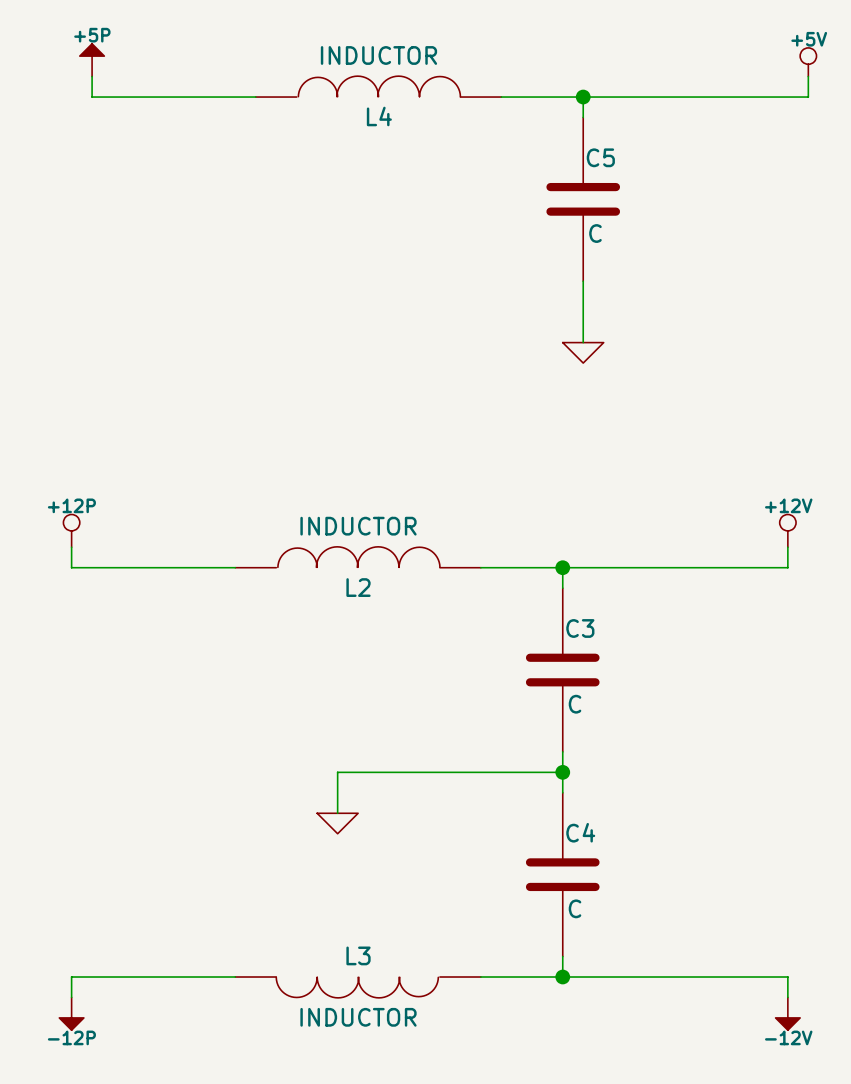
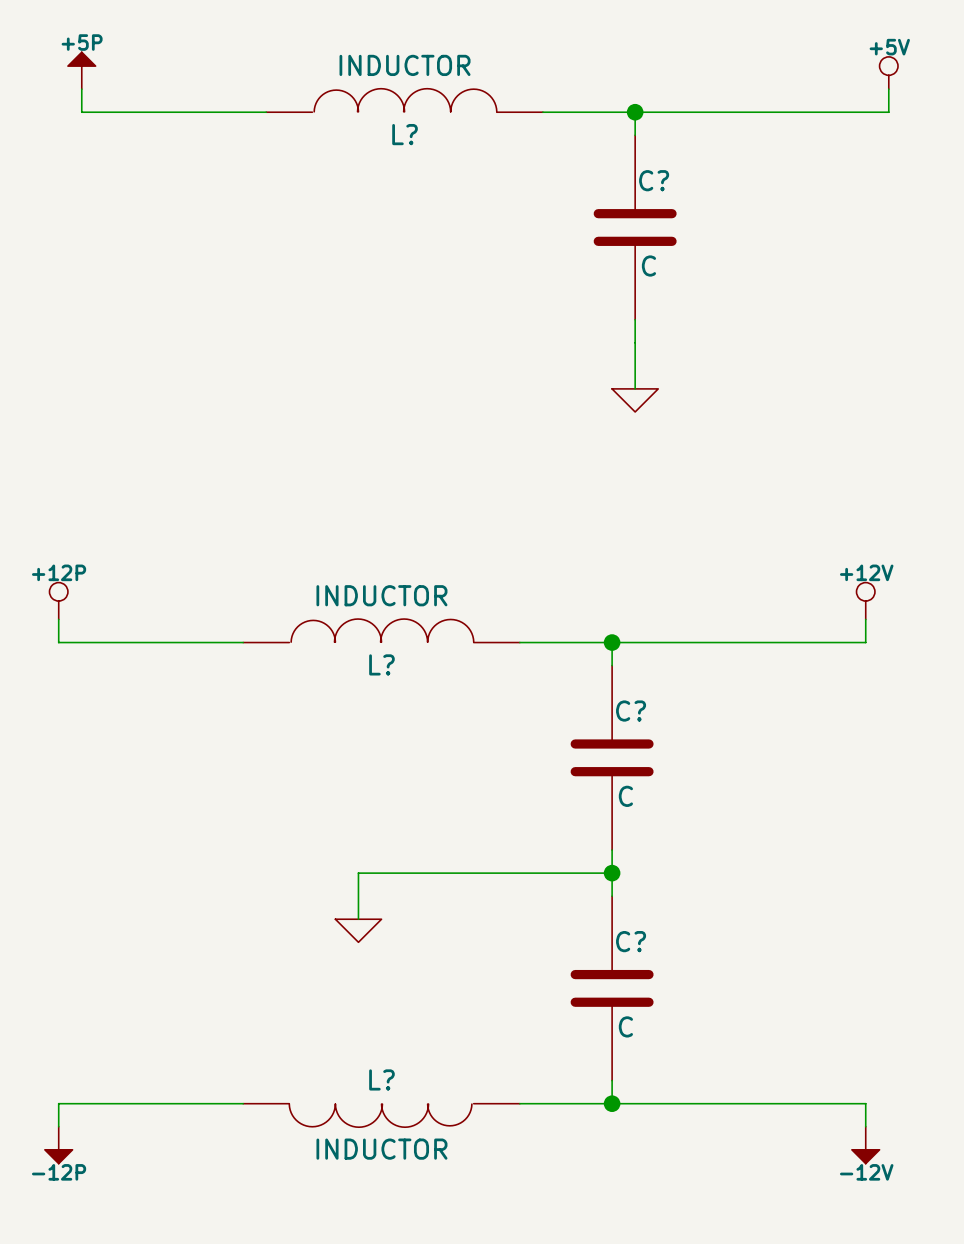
L4 name: L4 (379, 116) -> L? (405, 134)
C5 name: C5 (600, 157) -> C? (654, 180)
L2 name: L2 (358, 587) -> L? (381, 664)
C3 name: C3 (580, 628) -> C? (631, 711)
C4 name: C4 (580, 832) -> C? (631, 941)
L3 name: L3 (358, 955) -> L? (381, 1079)

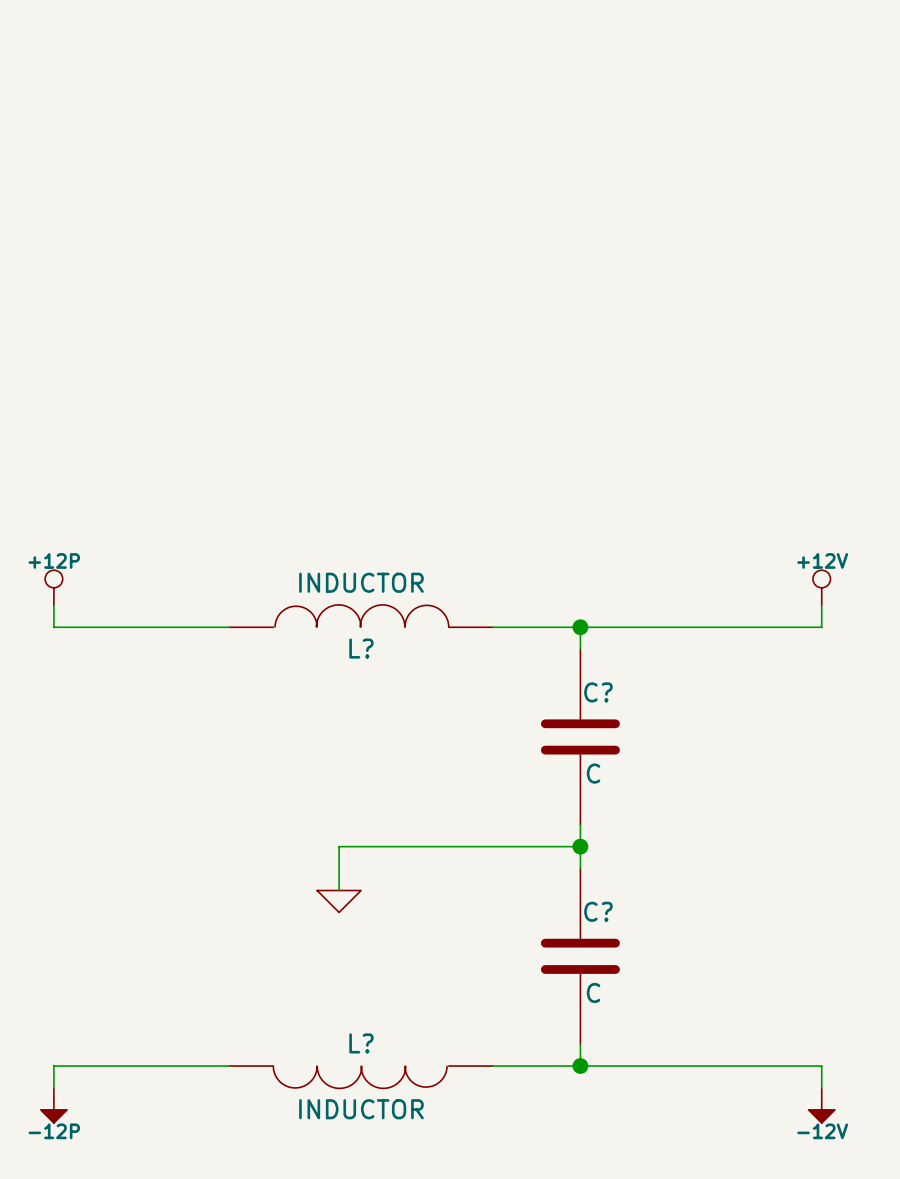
power symbol: +5P (81, 70) -> none
power symbol: +5V (888, 73) -> none
wire: (81, 89) (81, 112) (266, 112) -> none
wire: (888, 89) (888, 112) (542, 112) -> none
L?: INDUCTOR (404, 100) -> none
wire: (635, 112) (635, 135) -> none
junction: (635, 112) -> none
C?: C (635, 227) -> none
wire: (635, 319) (635, 388) -> none
power symbol: (635, 400) -> none

